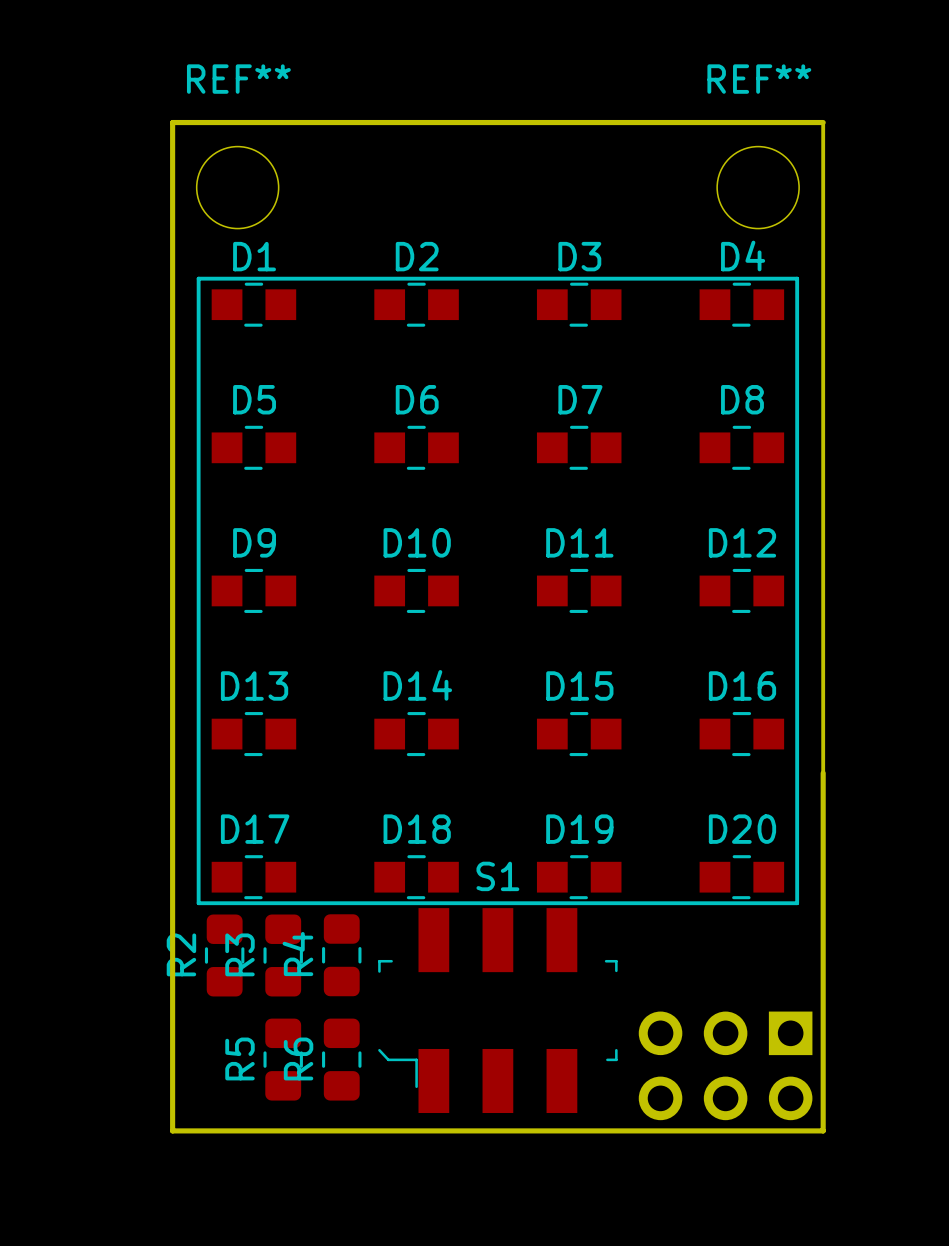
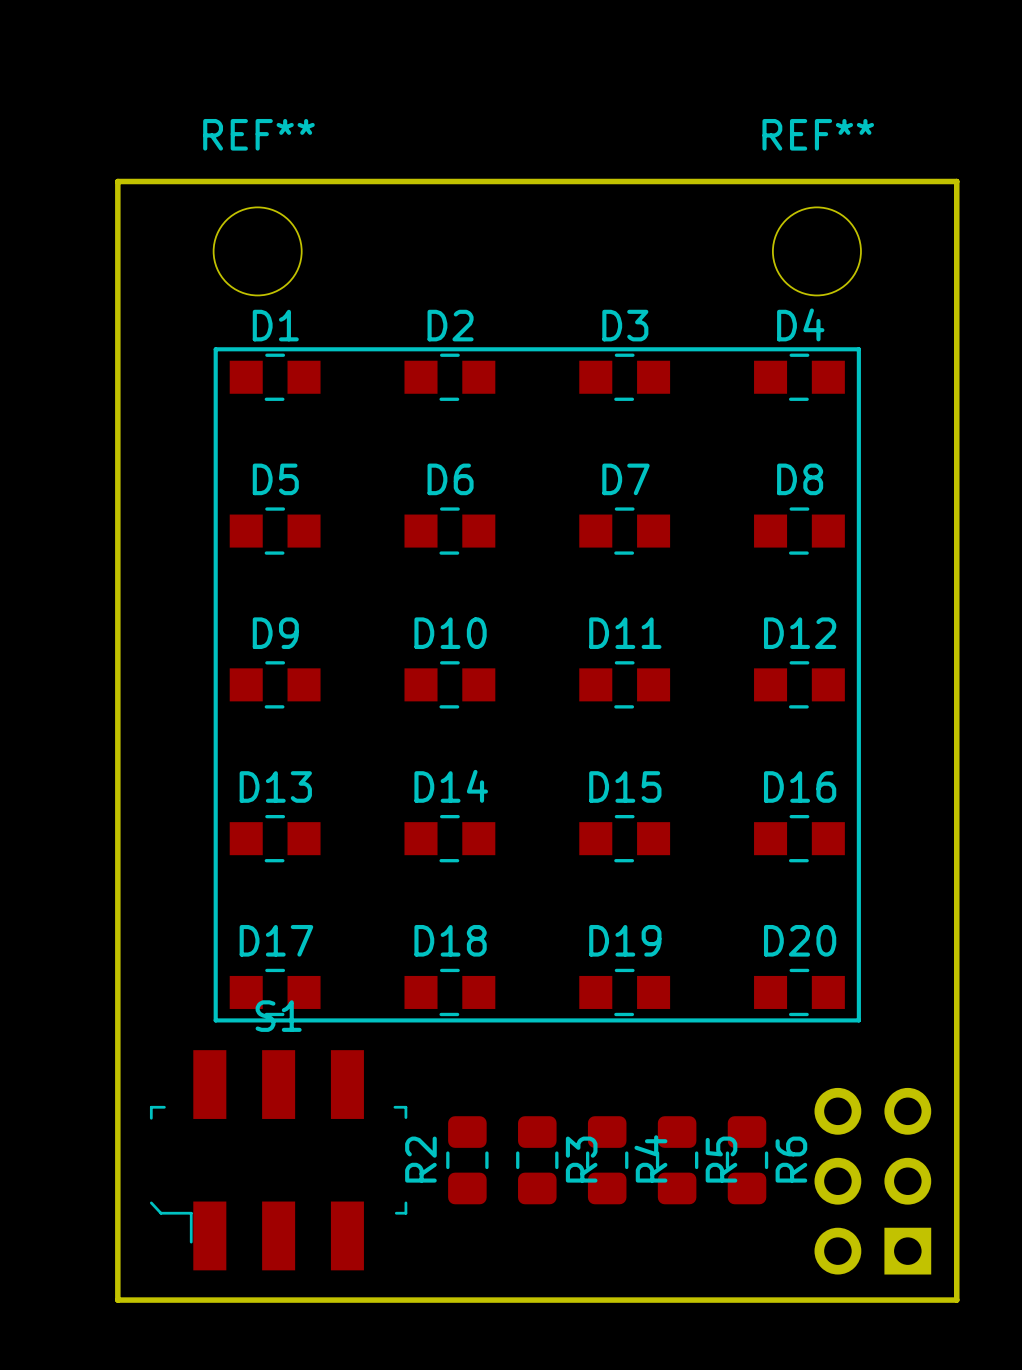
board edge: (172, 122) (172, 1130) (823, 1130) (823, 122) -> (187, 181) (117, 181) (117, 1300) (956, 1300) (956, 181) (886, 181)
R3 name position: R3 (239, 954) -> R3 (581, 1159)
R4 name position: R4 (297, 954) -> R4 (650, 1158)
R2 position: (224, 955) -> (467, 1160)
R3 position: (283, 955) -> (537, 1160)
R4 position: (341, 955) -> (607, 1160)
S1 position: (497, 1010) -> (278, 1160)
R5 name position: R5 (239, 1058) -> R5 (721, 1159)
R6 name position: R6 (298, 1058) -> R6 (791, 1159)
R5 position: (283, 1059) -> (677, 1160)
R6 position: (341, 1059) -> (747, 1160)
part rotation: 0° (725, 1065) -> 90° clockwise (872, 1181)

